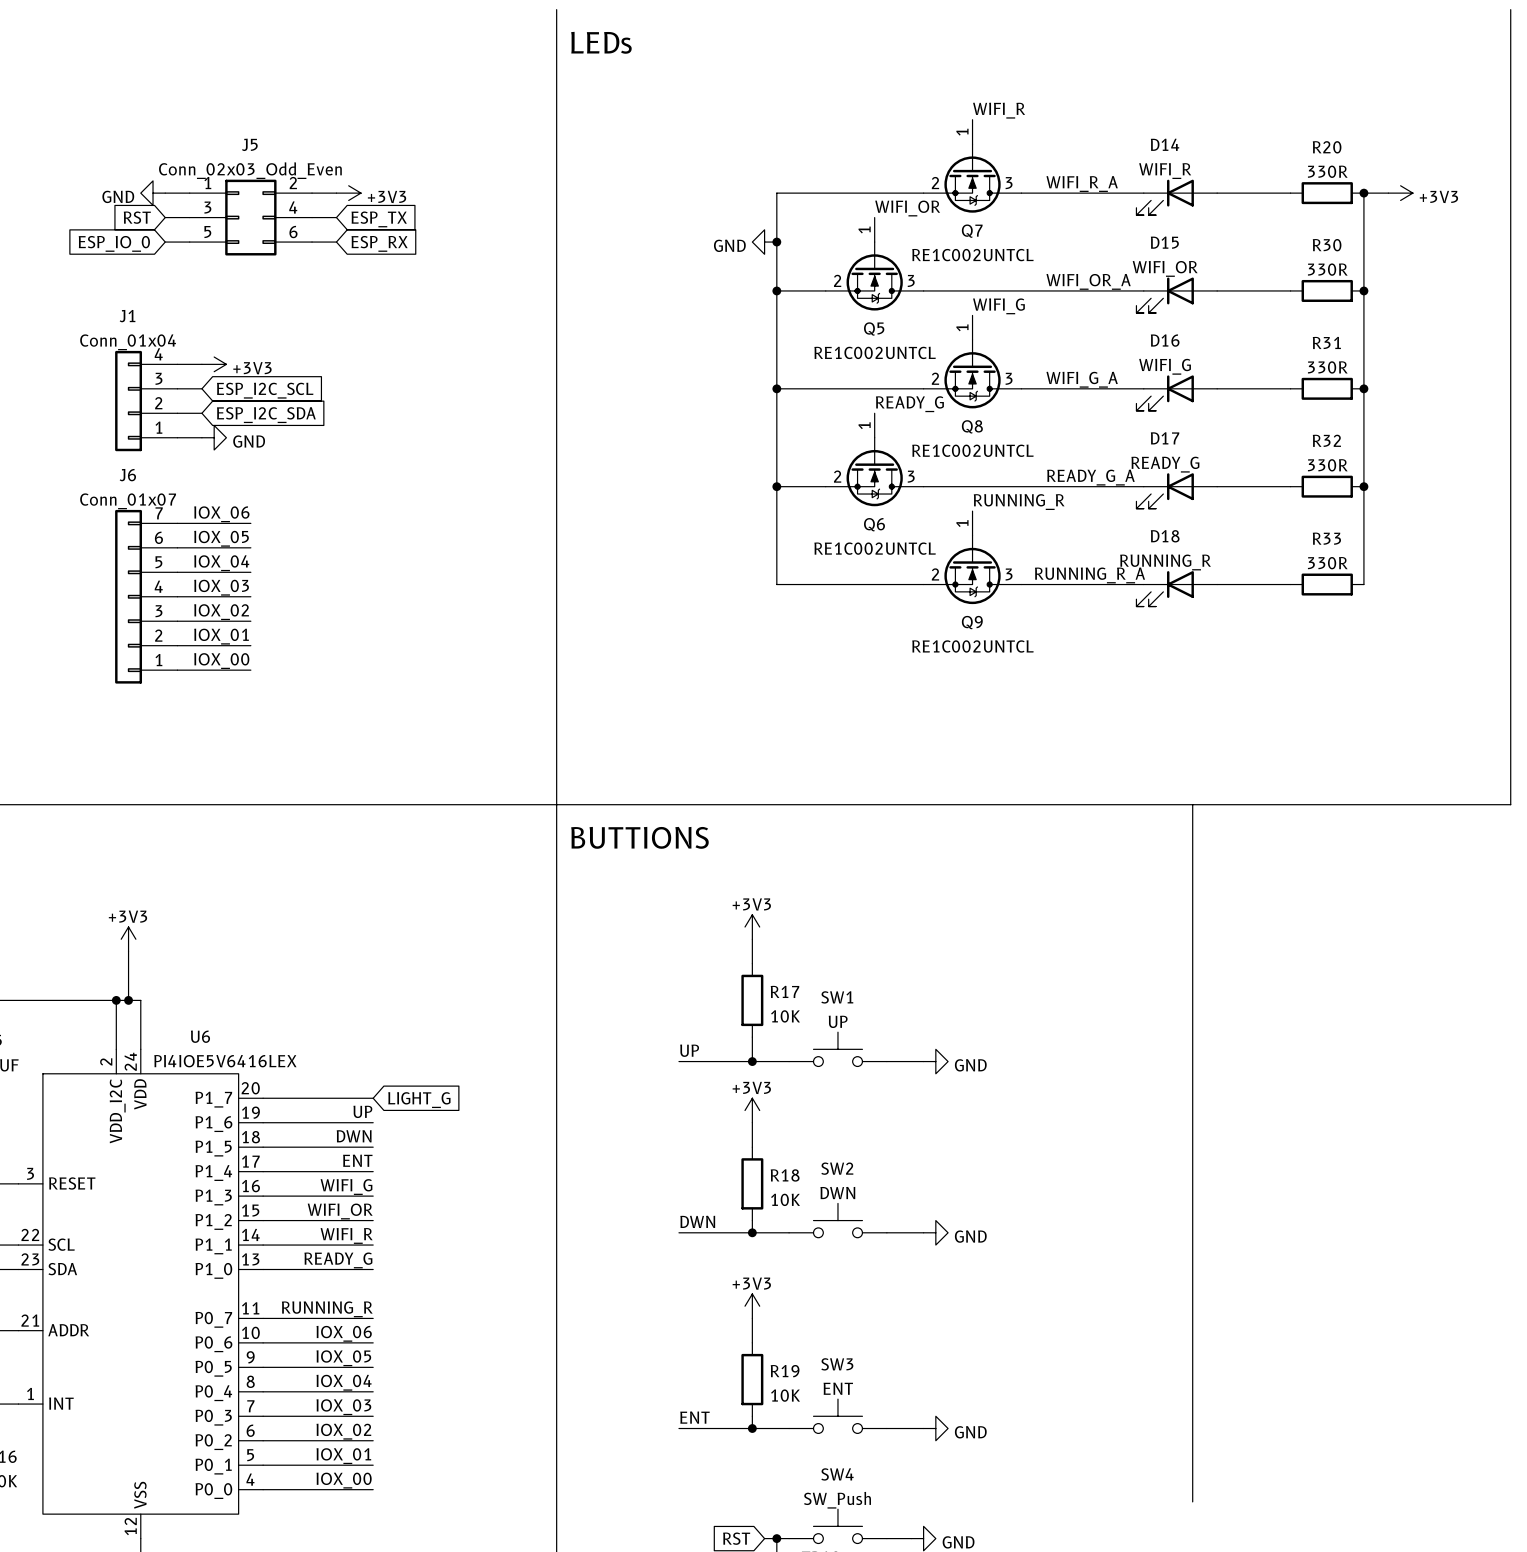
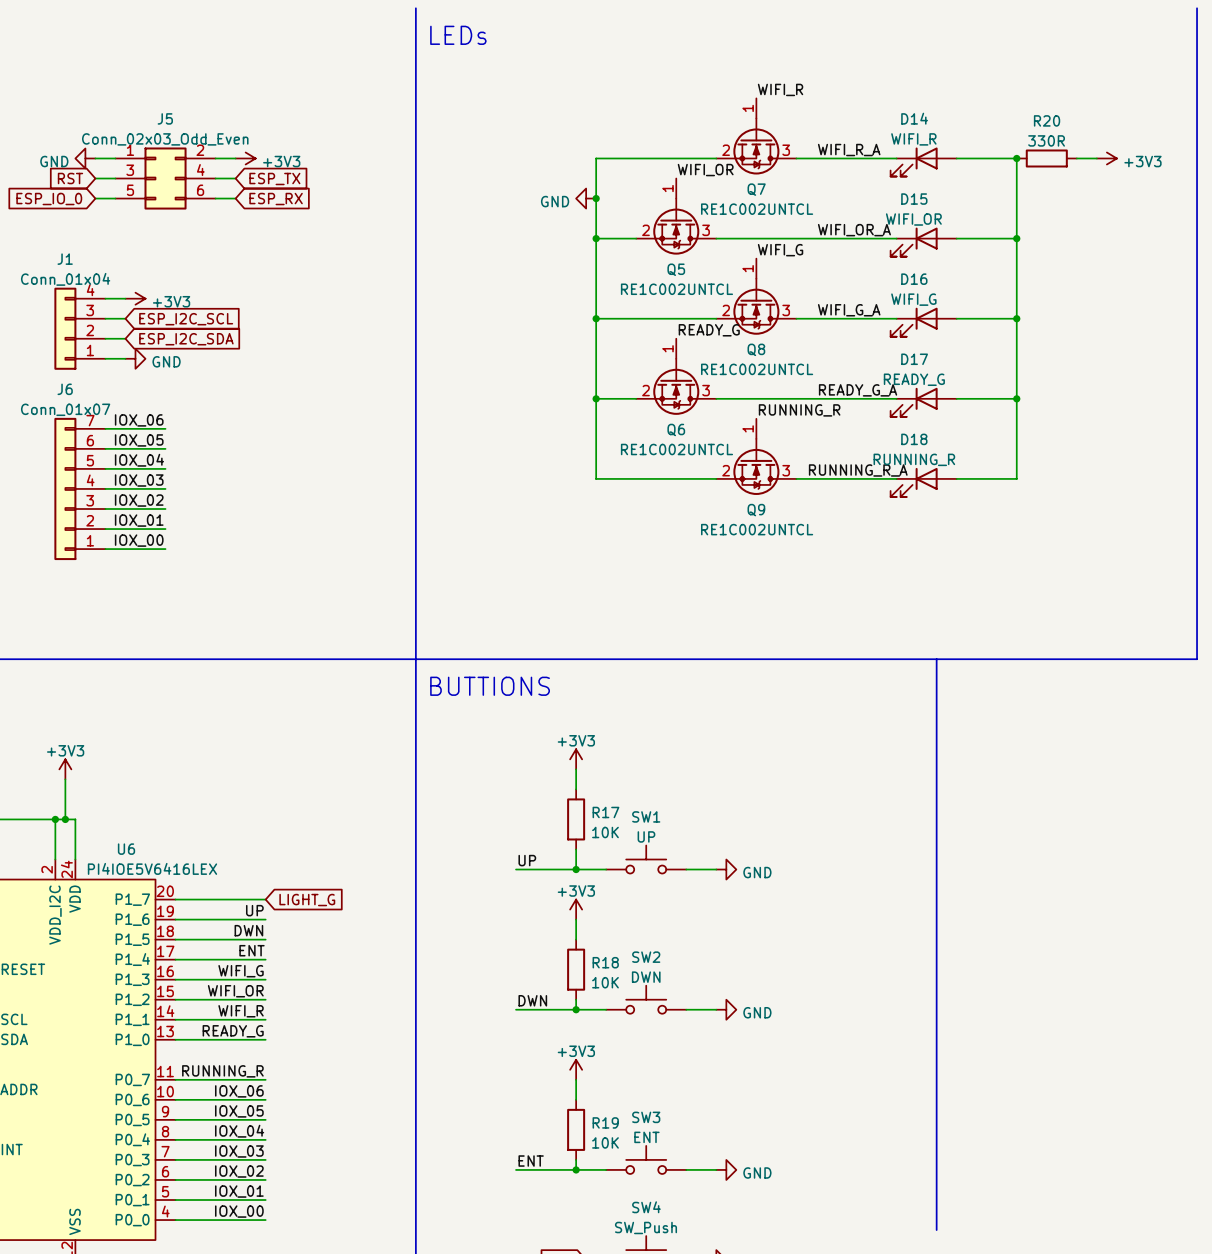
junction: none -> (1016, 158)
wire: (1363, 193) (1363, 584) -> (1016, 158) (1016, 478)
junction: (1363, 193) -> none
junction: none -> (1016, 238)
R30: 330R (1327, 290) -> none
junction: (1363, 290) -> none
junction: none -> (1016, 318)
R31: 330R (1327, 388) -> none
junction: (1363, 388) -> none
junction: none -> (1016, 398)
R32: 330R (1327, 486) -> none
junction: (1363, 486) -> none
R33: 330R (1327, 584) -> none

